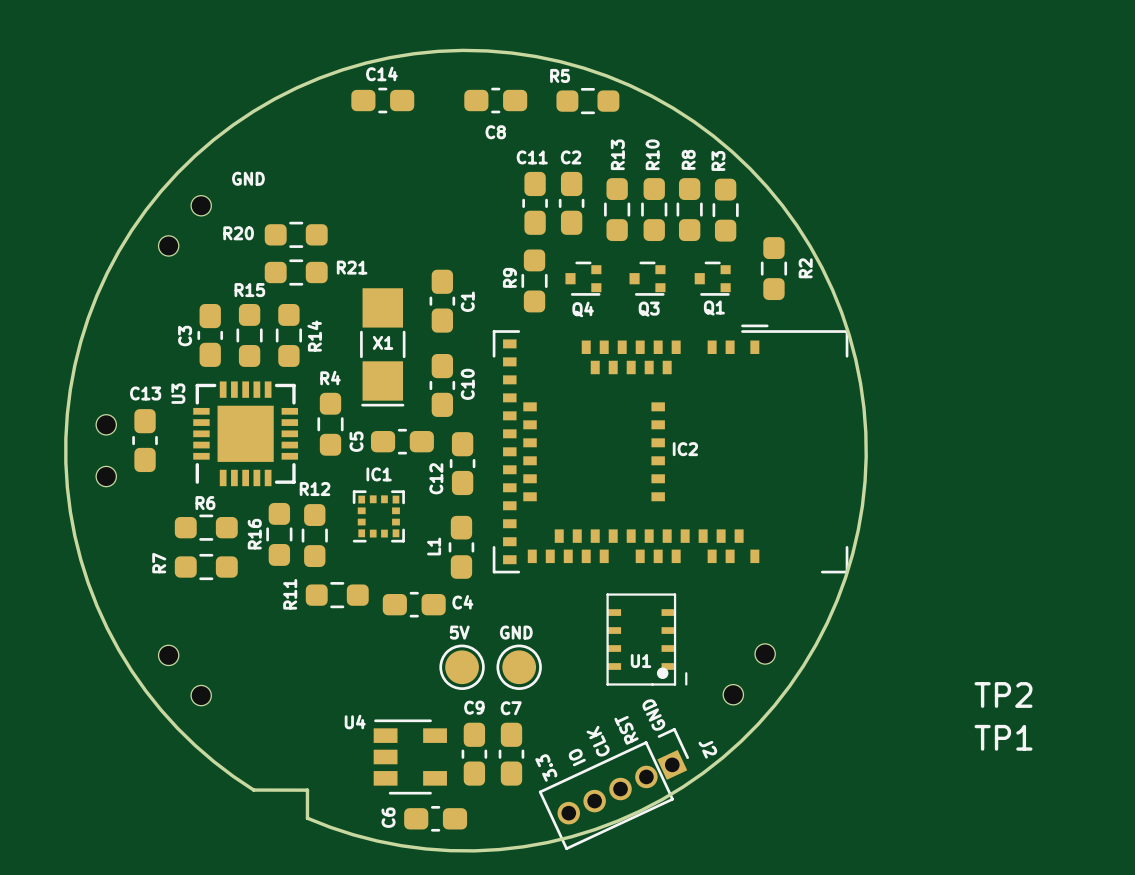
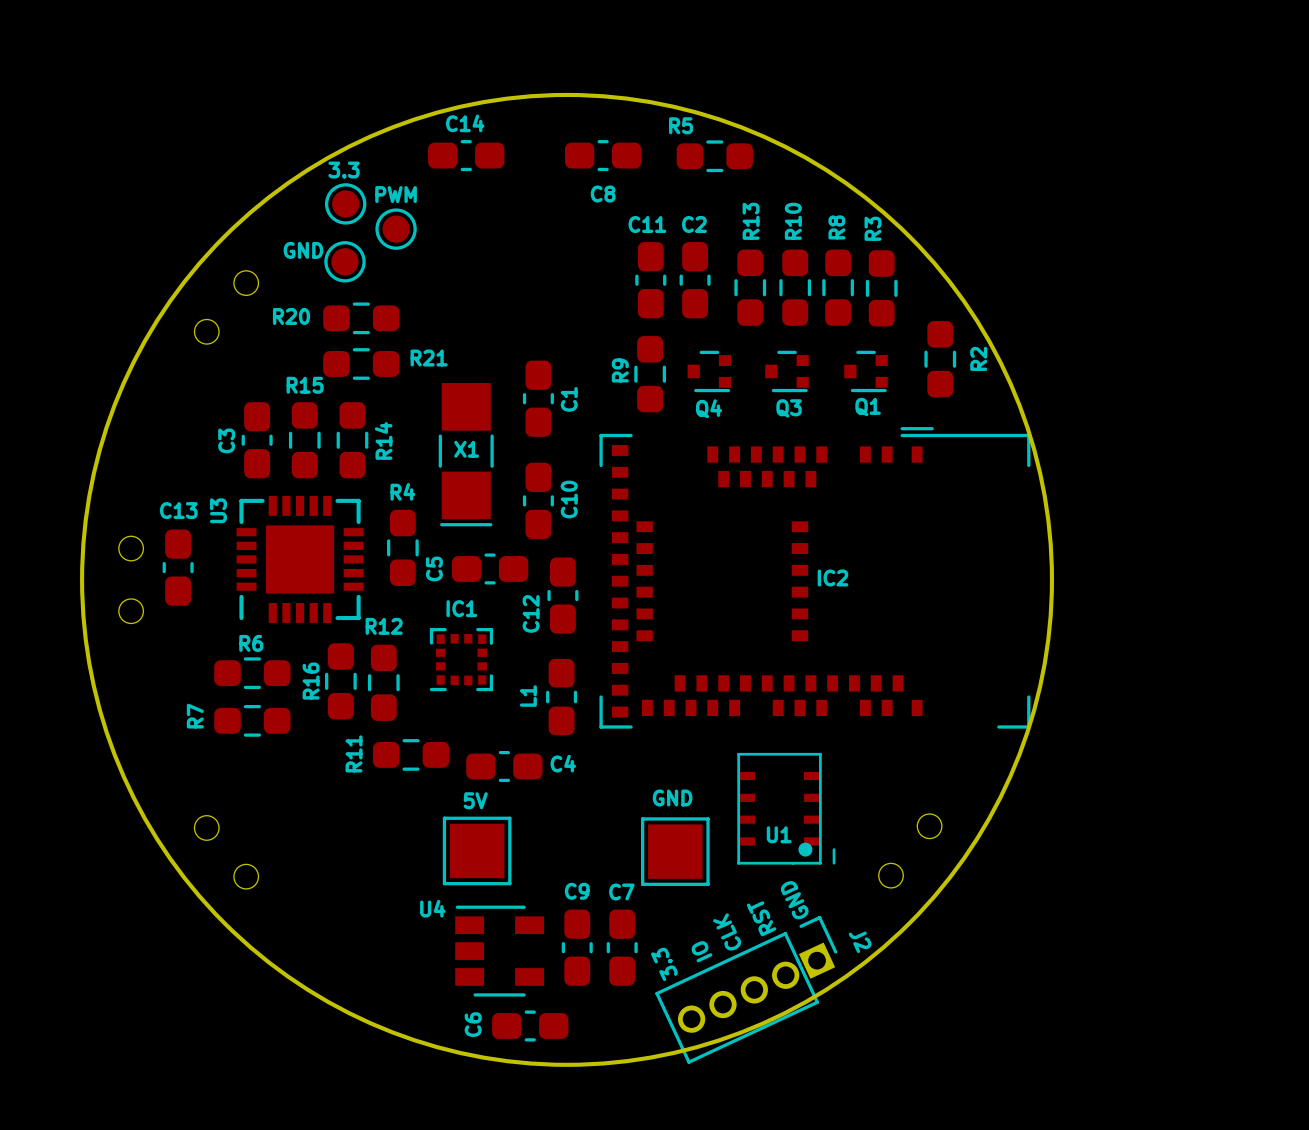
round board edge: none -> [80, 92, 1055, 1067]
text: none -> 3.3 (343, 170)
text: none -> PWM (396, 194)
part: none -> (345, 203)
part: none -> (396, 229)
part: none -> (344, 261)
text position: 5V (459, 632) -> 5V (475, 800)
text position: GND (516, 632) -> GND (672, 798)
TP1: (462, 667) -> none
TP2: (519, 667) -> none
part: none -> (477, 850)
part: none -> (675, 851)
board edge: (253, 790) (307, 790) (307, 818) (353, 834) (401, 845) (450, 850) (474, 850) (499, 849) (547, 842) (595, 829) (640, 810) (662, 799) (703, 772) (741, 741) (758, 724) (774, 705) (803, 665) (827, 623) (837, 600) (845, 577) (858, 530) (865, 481) (866, 457) (863, 408) (855, 359) (849, 335) (832, 289) (810, 246) (782, 205) (750, 168) (732, 151) (693, 121) (673, 108) (651, 96) (607, 76) (560, 61) (511, 53) (487, 50) (438, 51) (414, 53) (365, 63) (342, 69) (296, 87) (253, 111) (233, 125) (195, 155) (161, 191) (145, 210) (118, 251) (97, 295) (88, 318) (80, 341) (70, 389) (65, 438) (65, 463) (70, 511) (74, 535) (80, 559) (97, 606) (118, 650) (131, 670) (161, 710) (195, 745) (213, 761) (253, 790) -> none

